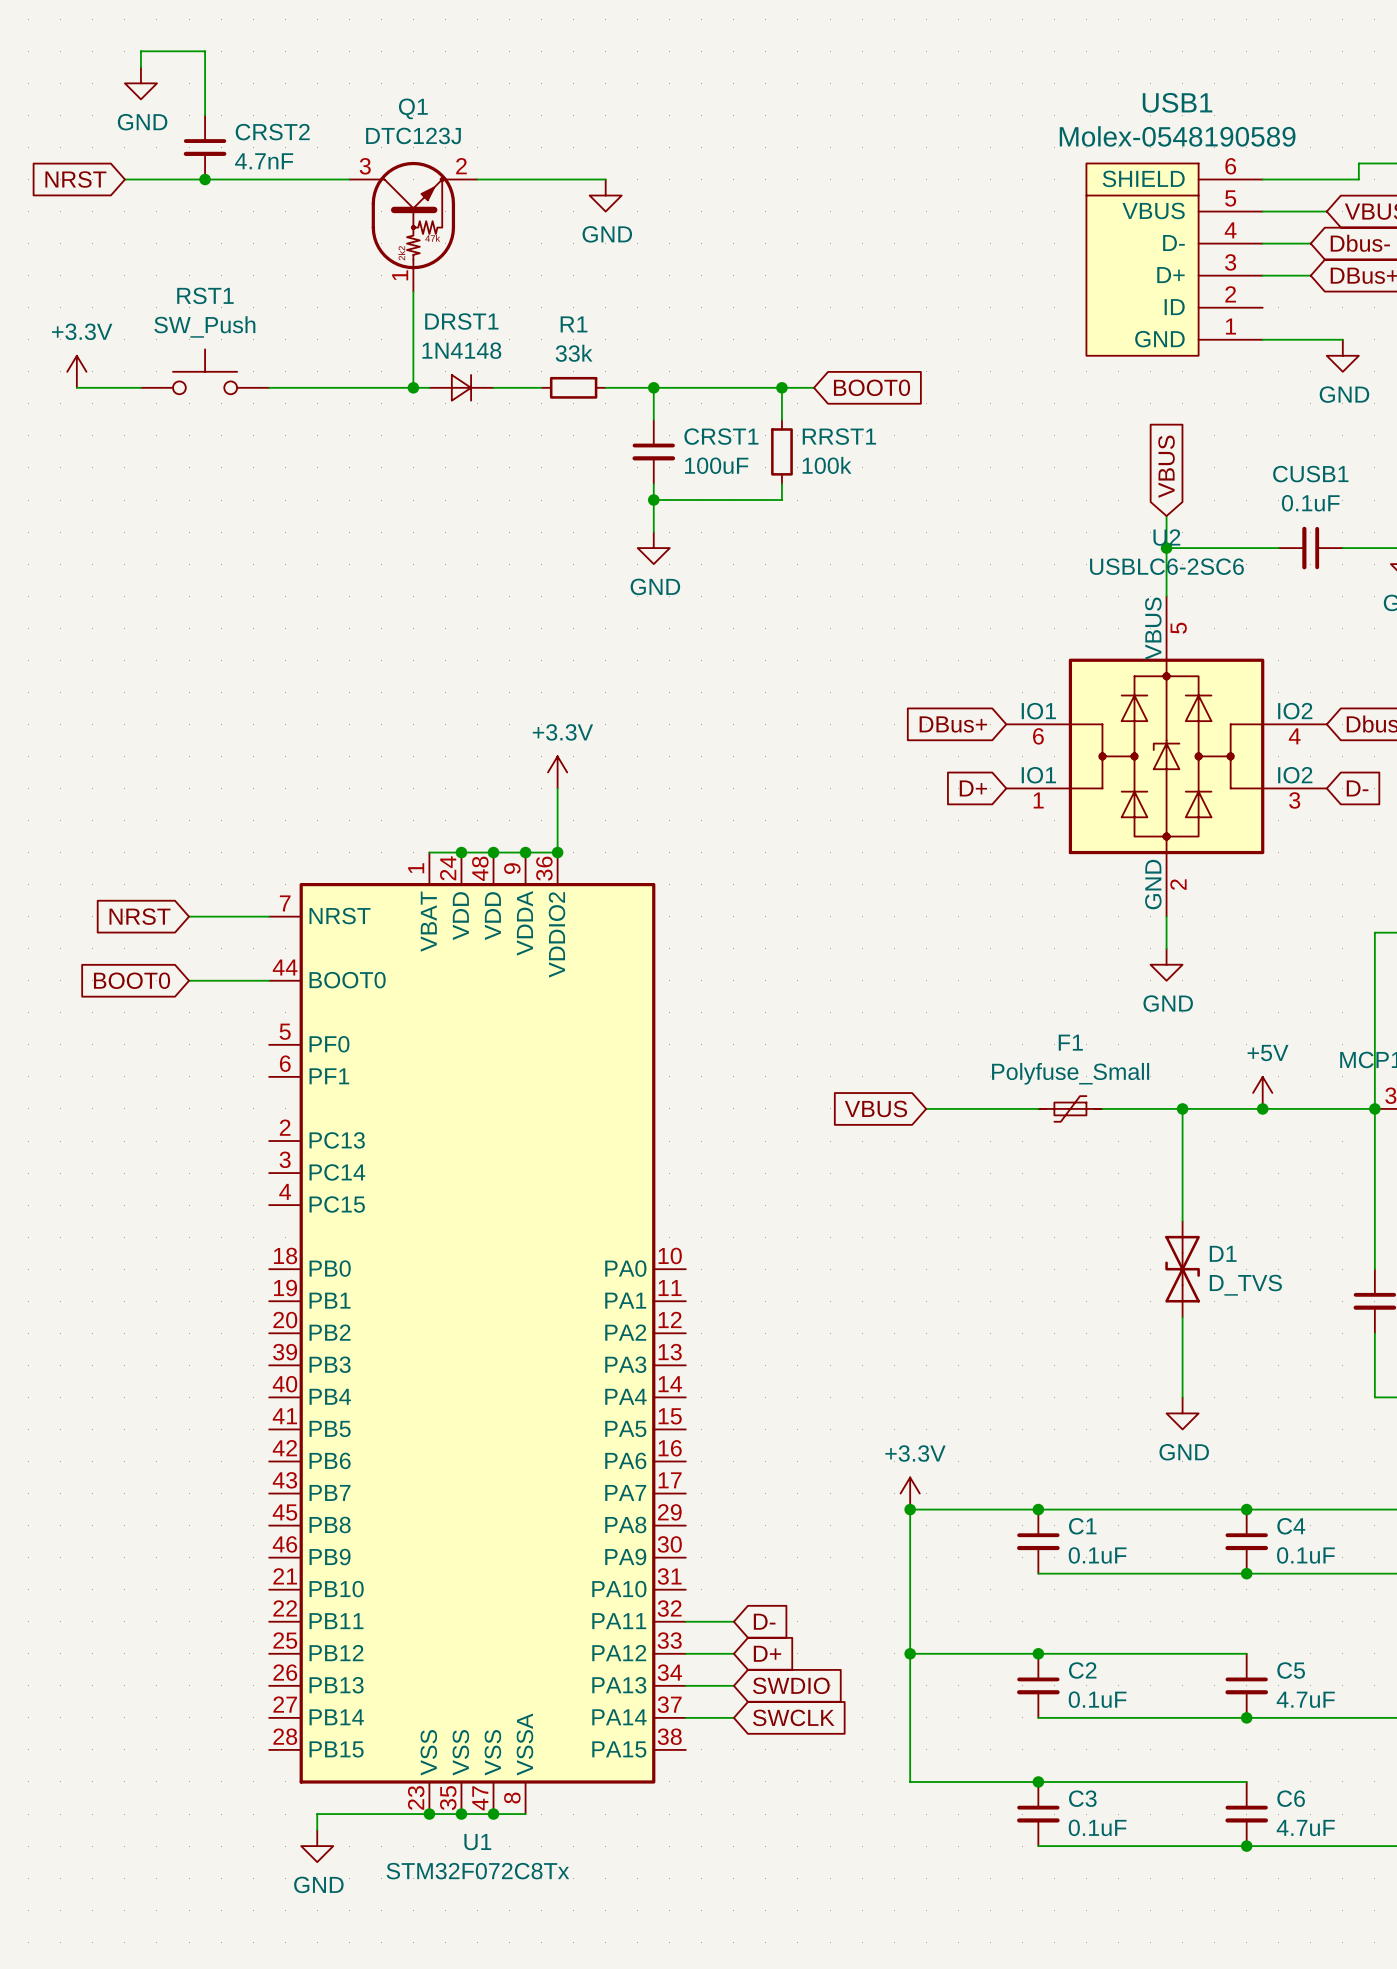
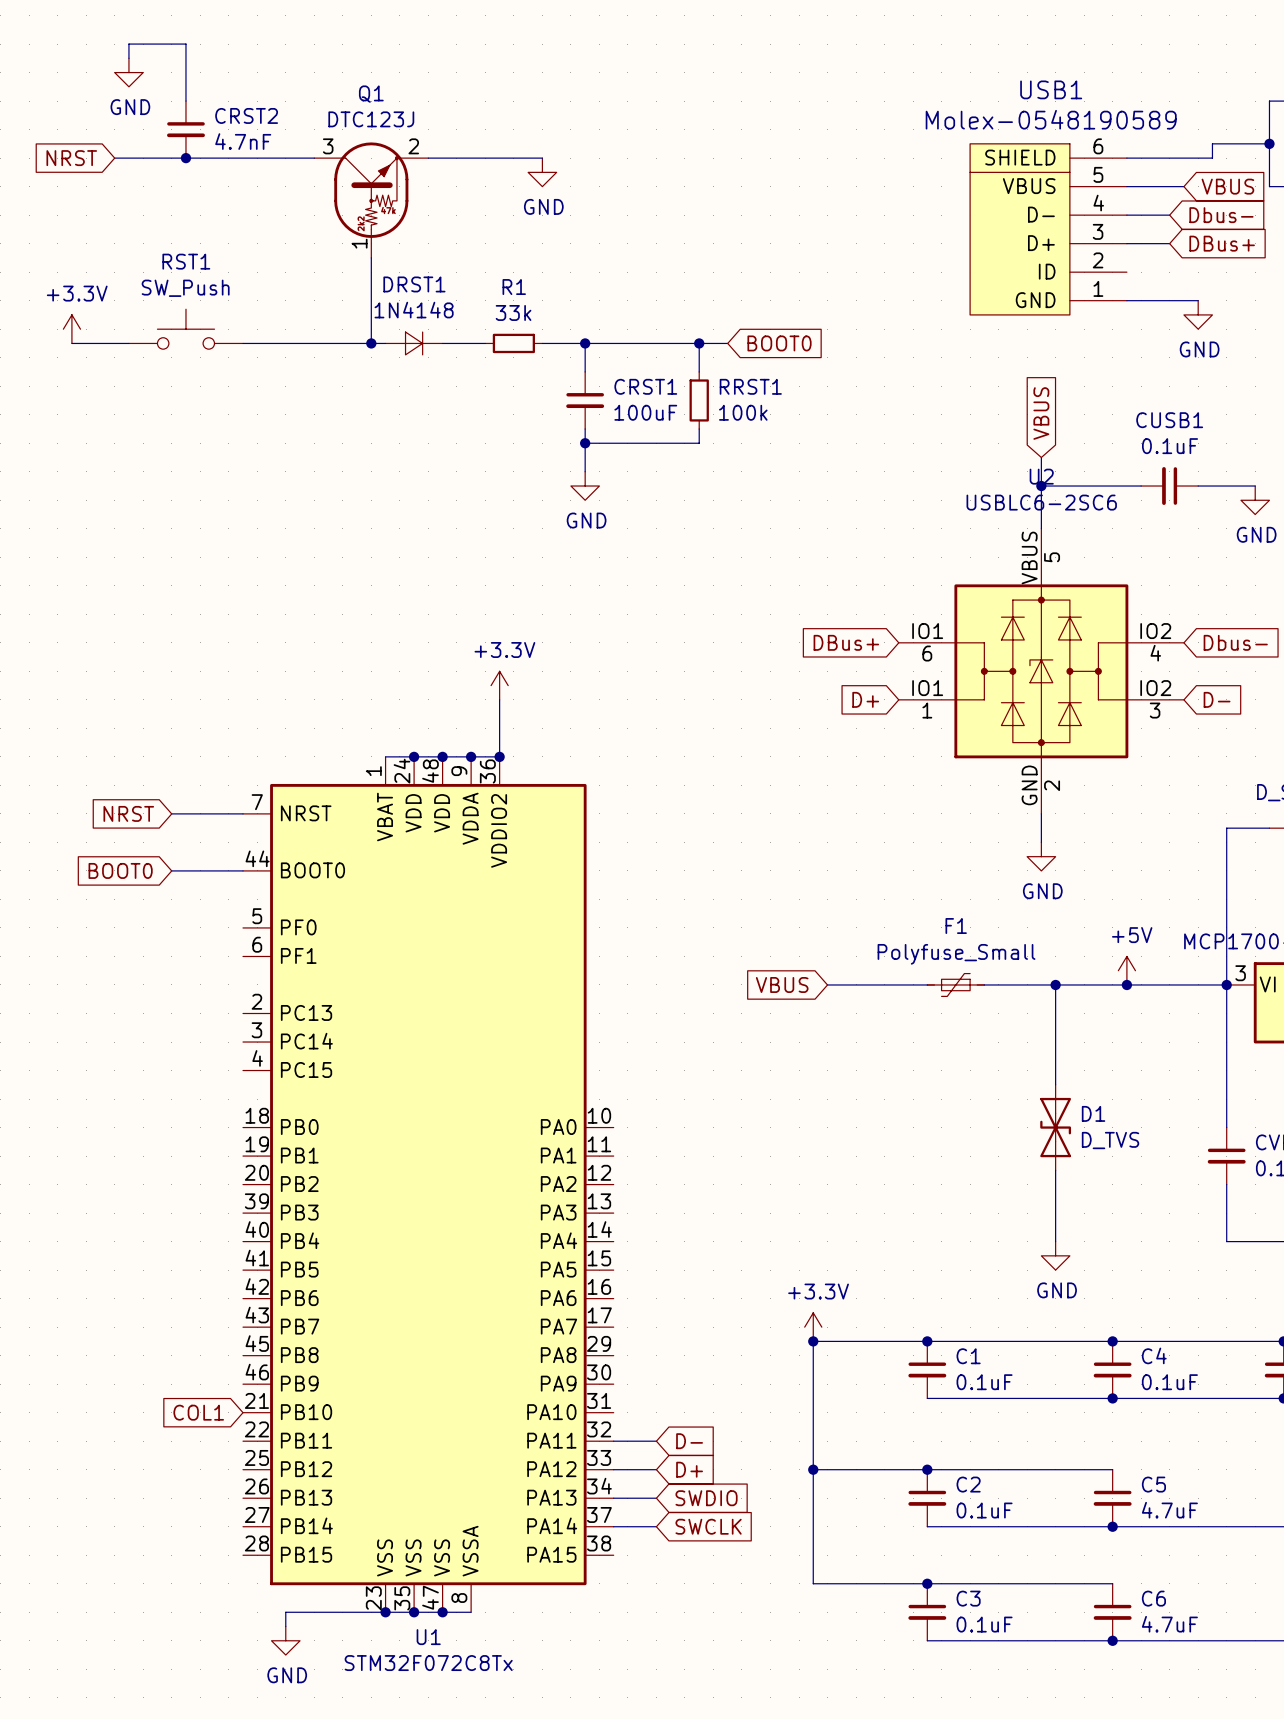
global label: none -> COL1 (198, 1412)

